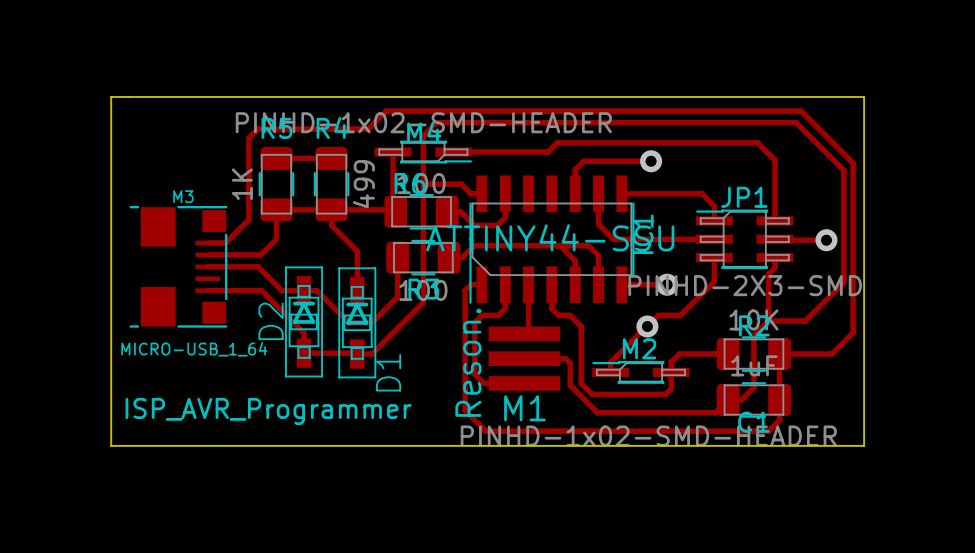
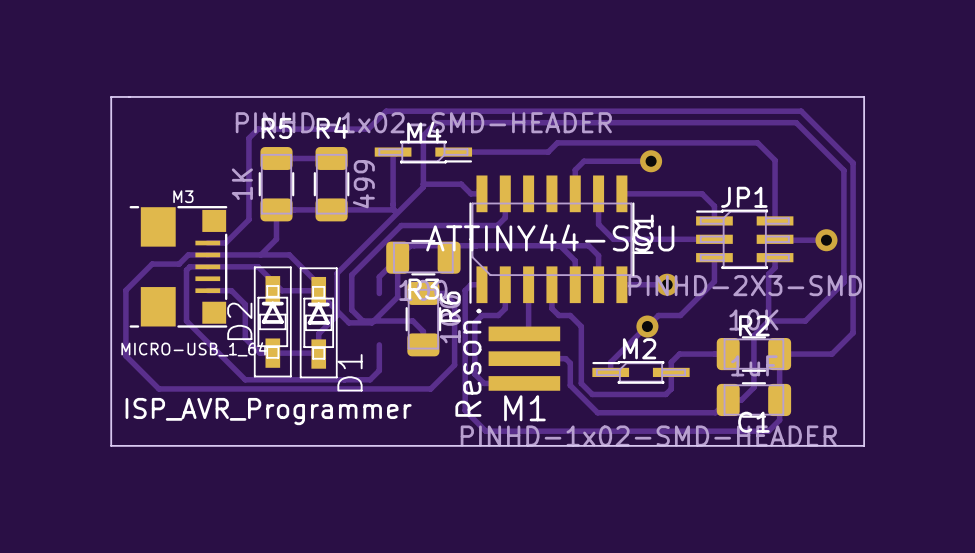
track: (423, 187) (423, 302) (371, 354) (317, 353) -> (423, 187) (337, 273) (337, 315) (318, 333) (317, 353)
track: (331, 209) (331, 225) (357, 251) (357, 291) -> none
R6 rotation: 0° (421, 211) -> 90° clockwise (423, 319)
R6 position: (421, 211) -> (423, 319)
track: (447, 211) (460, 211) (474, 225) -> (423, 344) (423, 331) (412, 321) (362, 321) (351, 309) (351, 275) (401, 225) (474, 225)
track: (474, 245) (462, 257) (449, 257) -> (474, 245) (410, 245) (379, 276) (379, 293)
track: none -> (207, 254) (188, 254) (179, 264) (152, 264) (125, 290) (125, 355) (158, 388) (430, 388) (454, 365) (454, 304) (443, 293) (423, 293)
track: none -> (260, 254) (289, 254) (318, 284) (318, 291)
track: none -> (207, 266) (189, 266) (186, 270) (186, 321) (245, 379) (370, 379) (379, 370) (379, 344)
track: (231, 290) (261, 290) (304, 332) (304, 353) -> (231, 290) (245, 304) (245, 338) (259, 353) (304, 353)
D2 position: (304, 321) -> (272, 321)
D1 position: (357, 322) -> (318, 322)

